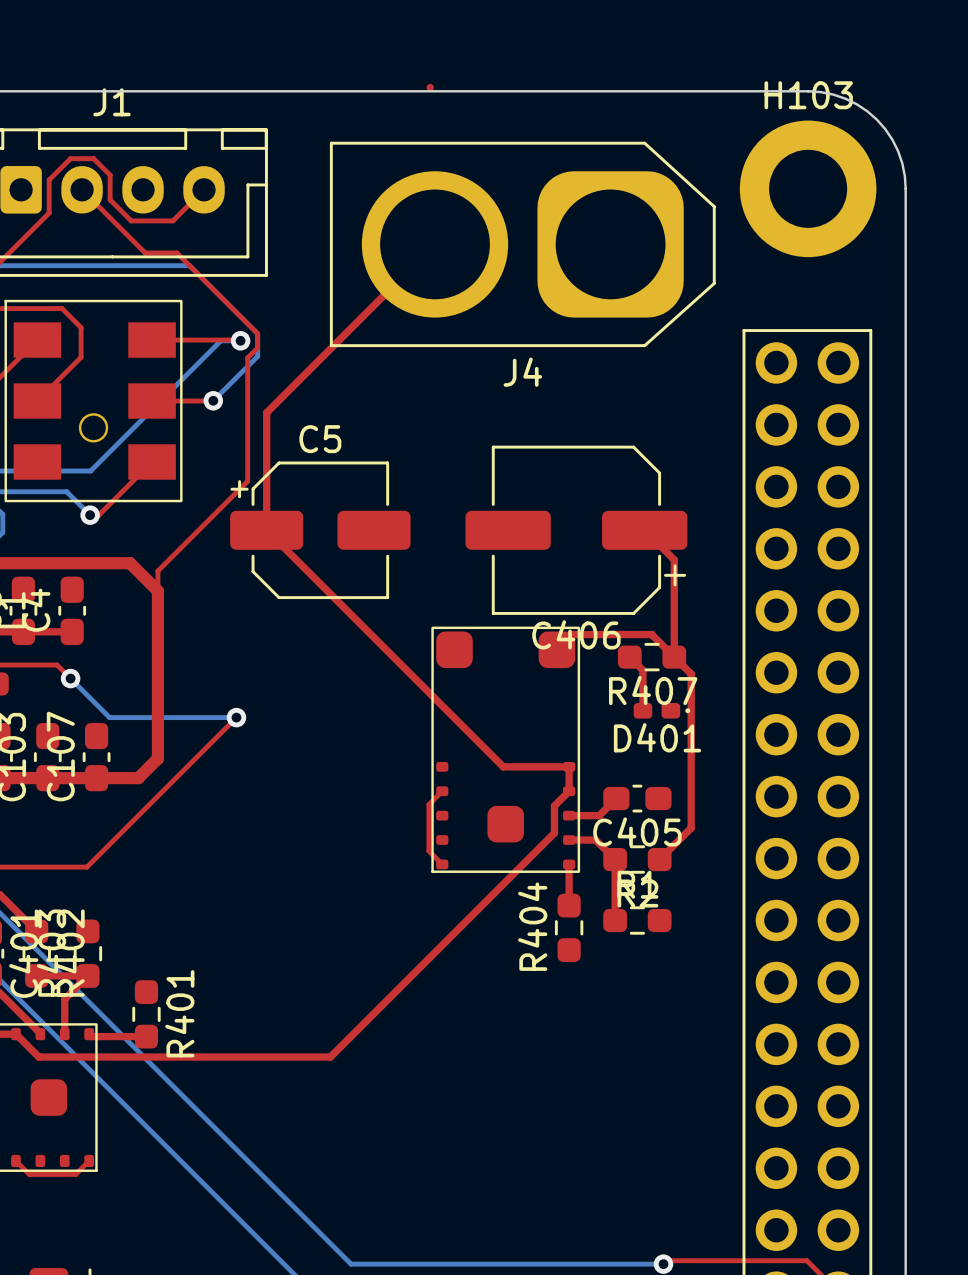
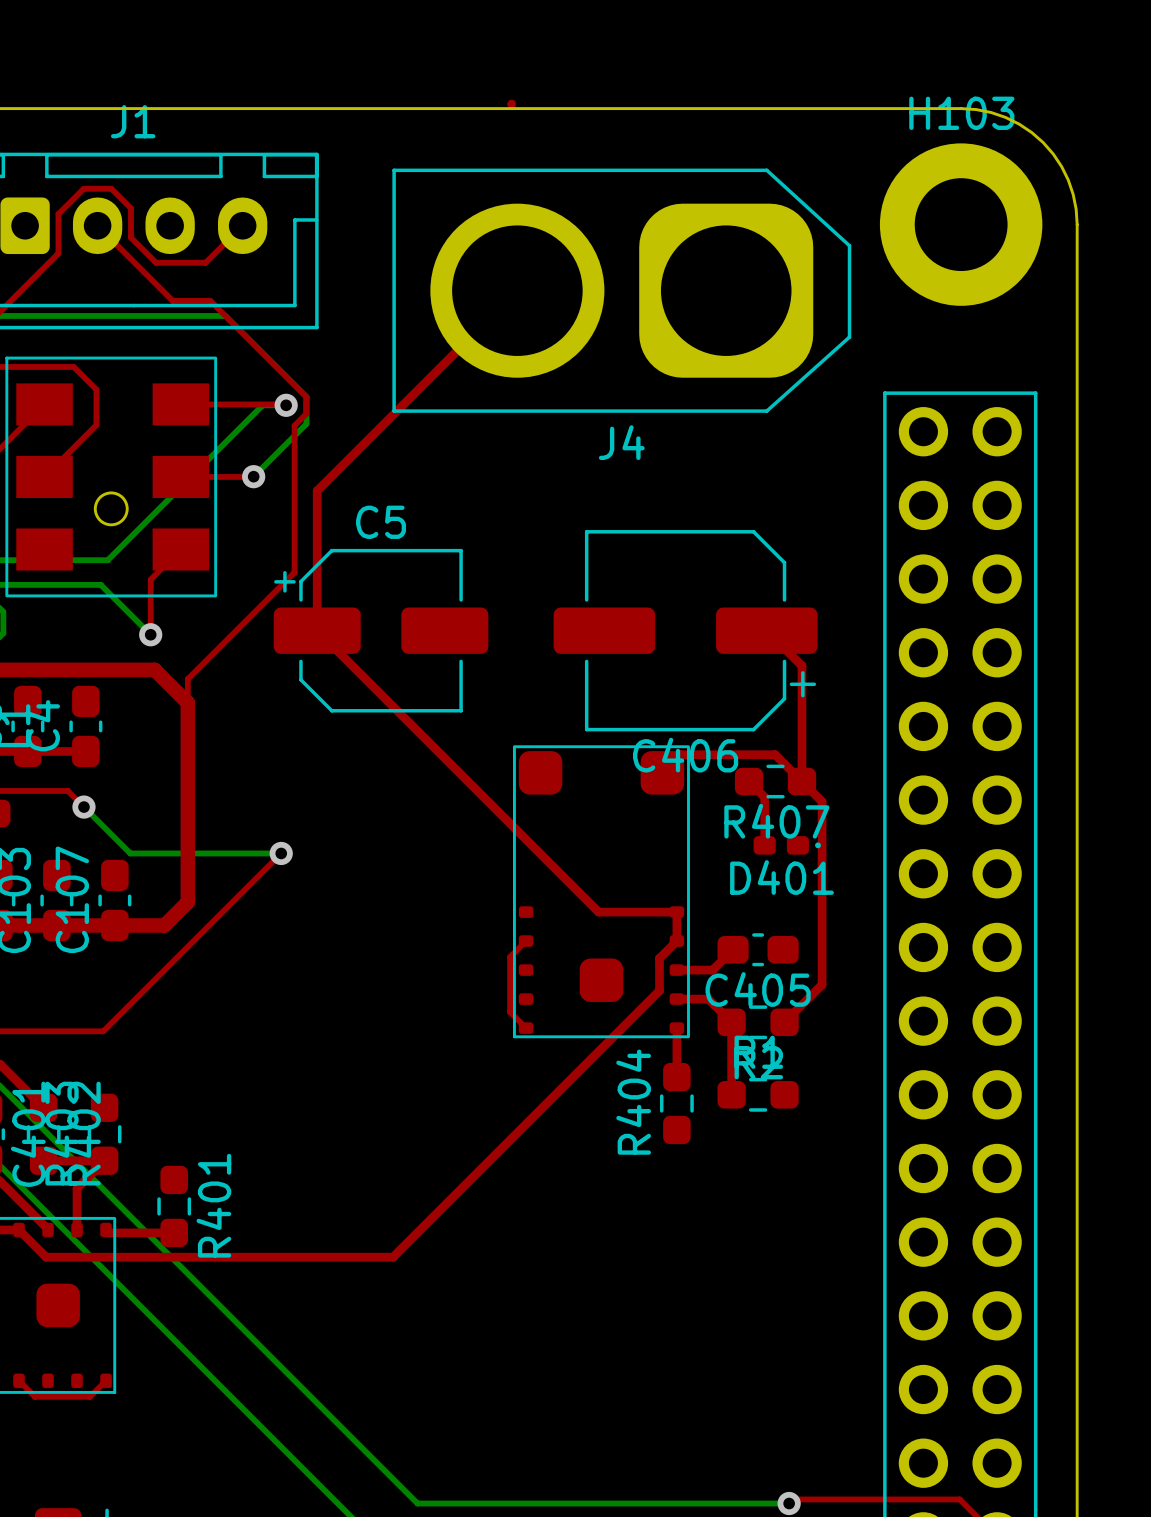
top track: (126, 487) (98, 515) (90, 515) -> (150, 579) (150, 634)
bottom track: (66, 491) (90, 515) -> (79, 584) (100, 584) (150, 634)
via position: (90, 515) -> (150, 634)

